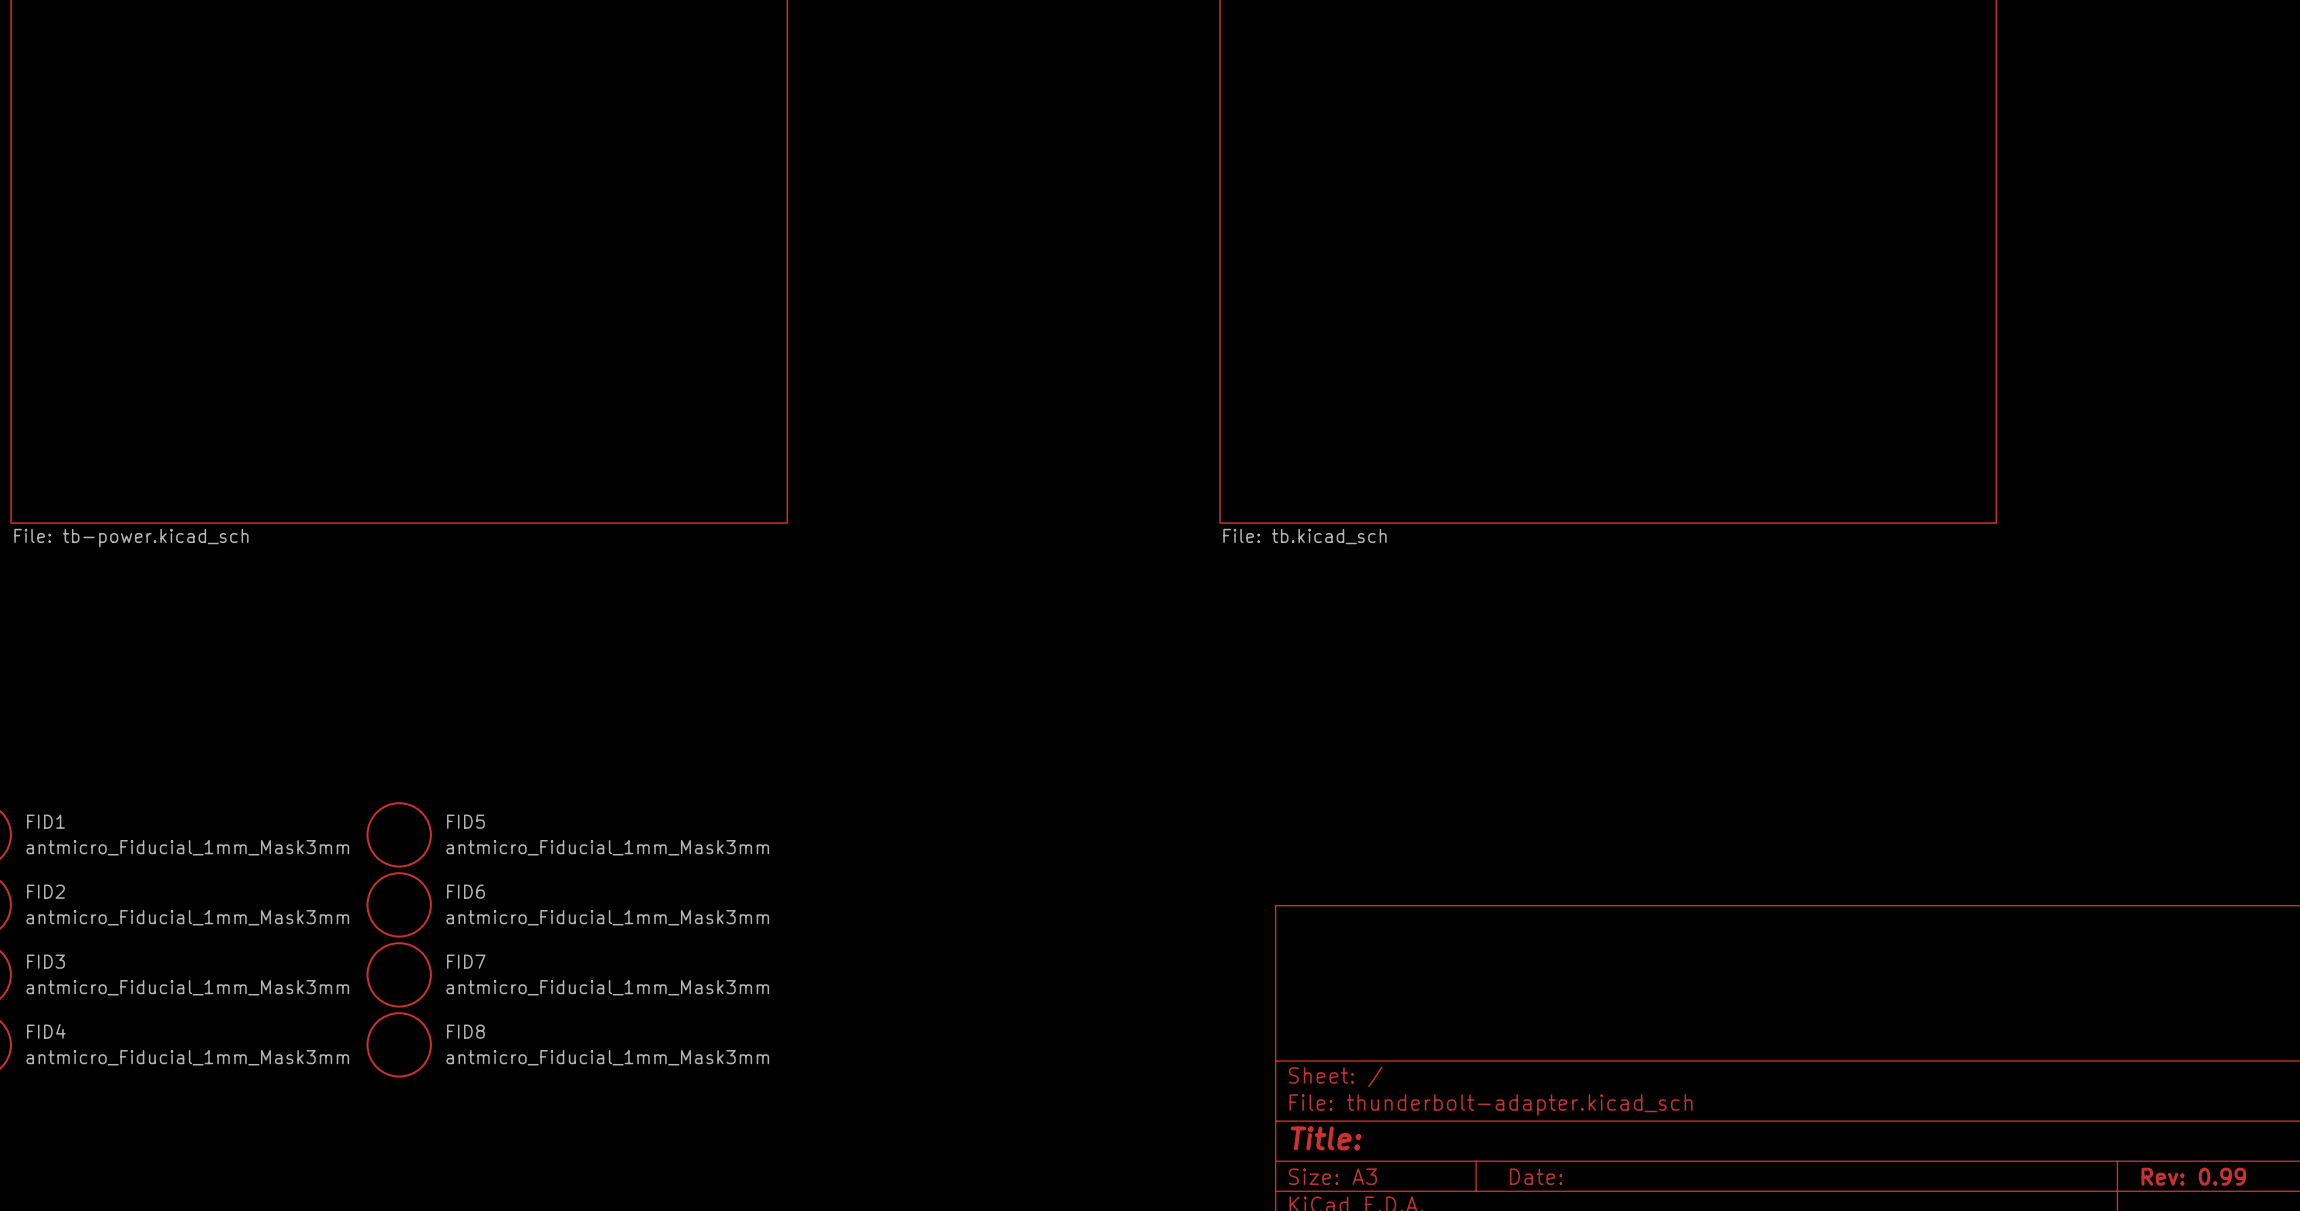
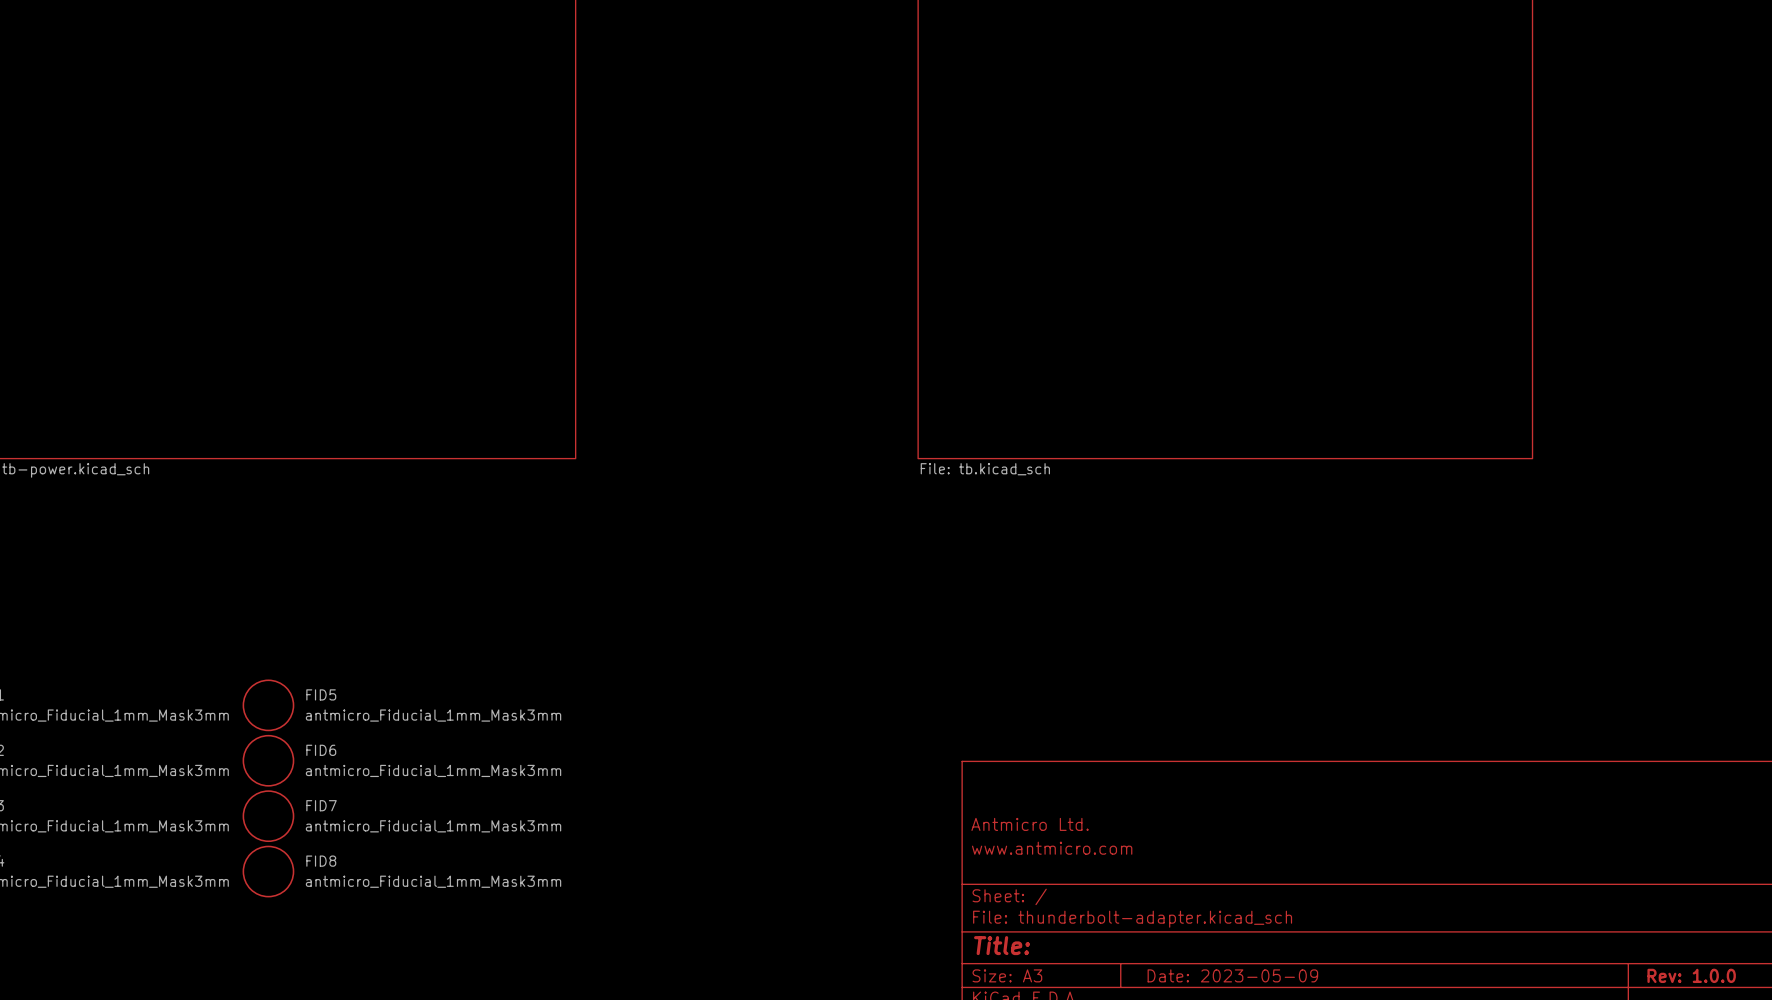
title block: none -> Antmicro Ltd. (1030, 824)
title block: none -> www.antmicro.com (1052, 848)
title block: Date: (1536, 1176) -> Date: 2023-05-09 (1232, 975)
title block: Rev: 0.99 (2193, 1176) -> Rev: 1.0.0 (1691, 975)

